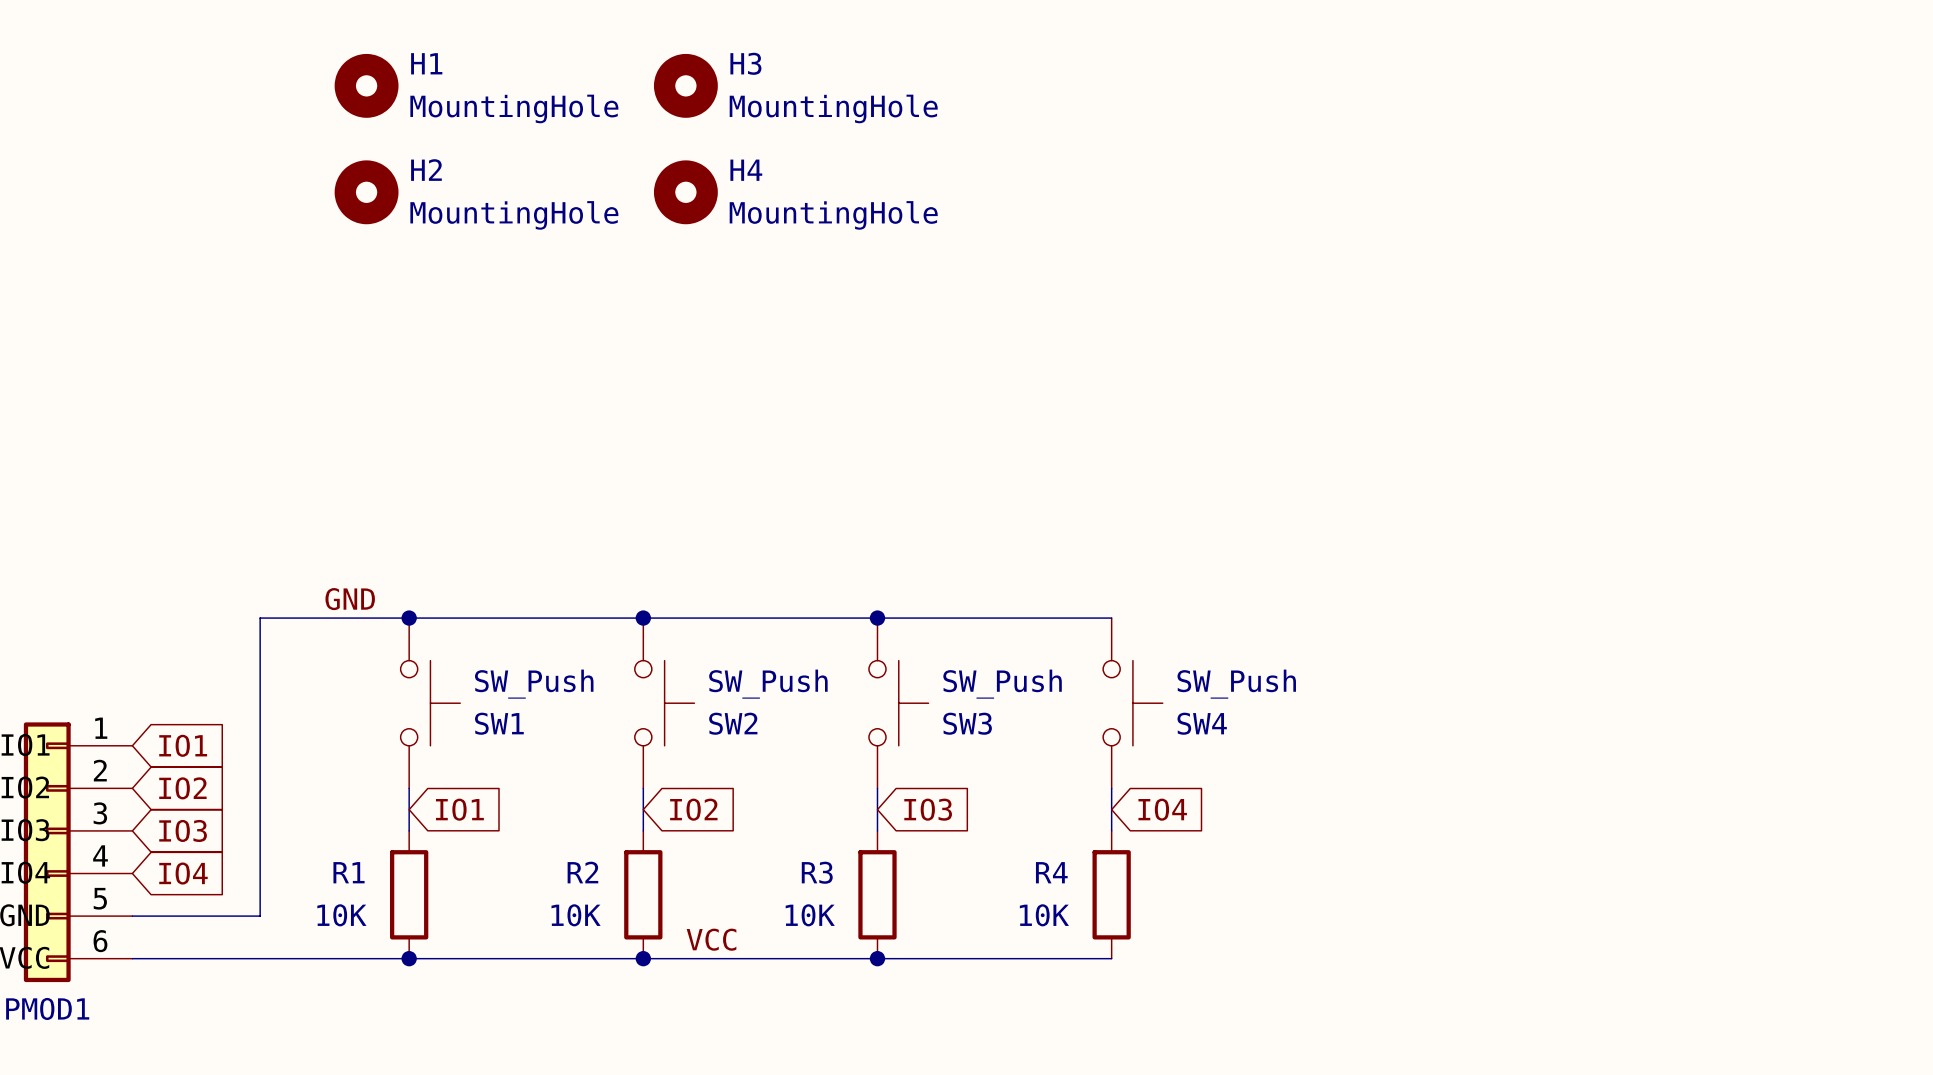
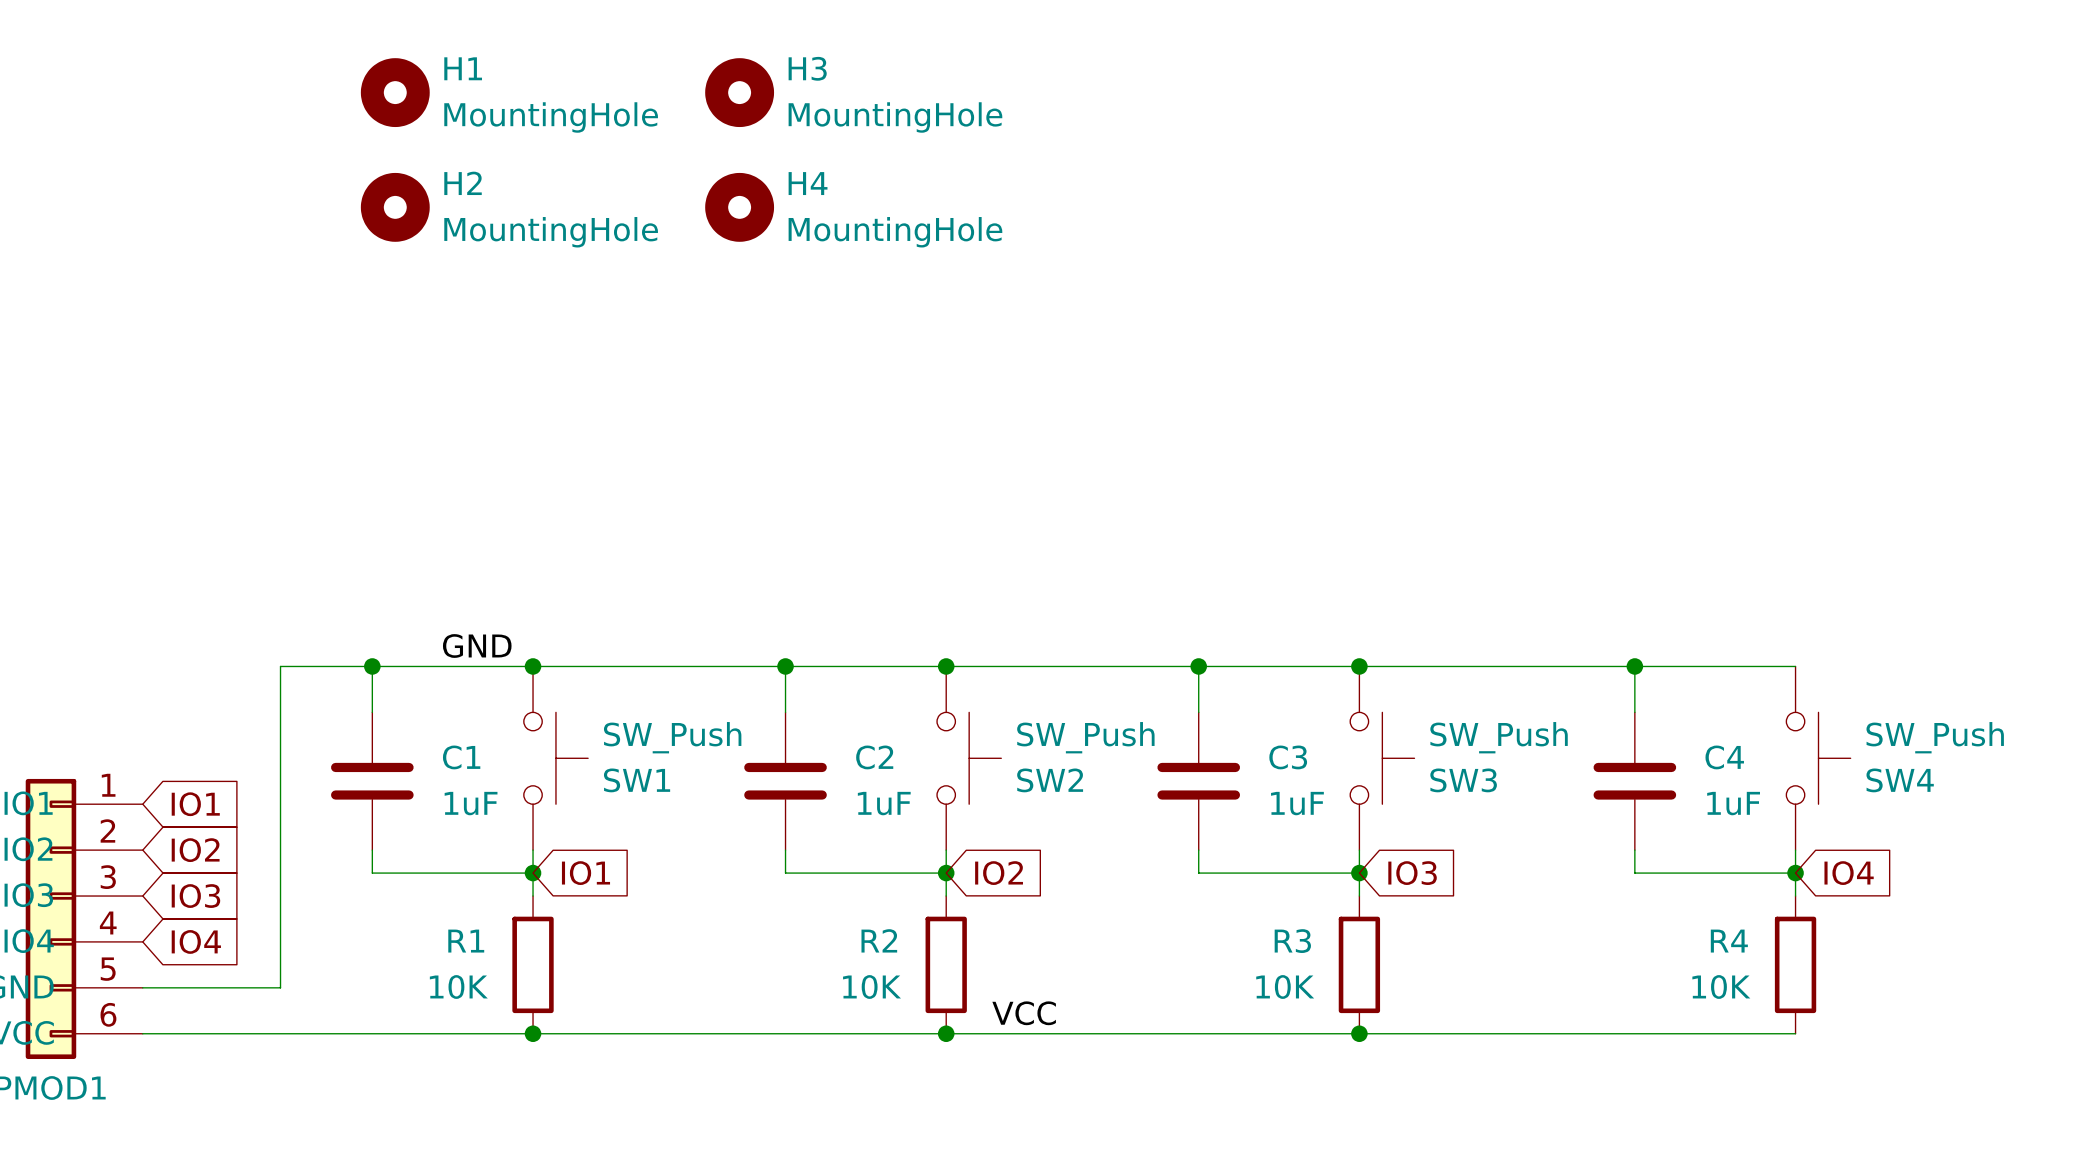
label position: GND (350, 599) -> GND (477, 646)
wire: none -> (372, 666) (372, 712)
junction: none -> (372, 666)
junction: (409, 618) -> none
junction: none -> (533, 666)
junction: (643, 618) -> none
junction: none -> (785, 666)
junction: none -> (1198, 666)
junction: none -> (1359, 666)
wire: none -> (1634, 666) (1634, 712)
junction: none -> (1634, 666)
wire: none -> (1795, 666) (1198, 666) (1198, 712)
SW1 position: (430, 703) -> (555, 758)
SW2: SW_Push (664, 703) -> none
SW4 position: (1132, 703) -> (1818, 758)
SW3: none -> SW_Push (1382, 758)
SW3 name: SW3 (967, 723) -> SW2 (1050, 780)
C1: none -> 1uF (372, 781)
C2: none -> 1uF (785, 781)
C3: none -> 1uF (1198, 781)
C4: none -> 1uF (1634, 781)
wire: none -> (372, 850) (372, 873) (533, 873)
wire: (409, 788) (409, 830) -> (533, 850) (533, 896)
wire: (643, 788) (643, 830) -> (785, 666) (785, 712)
wire: none -> (785, 850) (785, 873) (946, 873)
wire: none -> (1359, 850) (1359, 896)
wire: none -> (1634, 850) (1634, 873) (1795, 873)
wire: none -> (1795, 850) (1795, 896)
global label position: IO1 (459, 809) -> IO1 (585, 873)
junction: none -> (533, 873)
global label: IO2 (693, 809) -> none
junction: none -> (946, 873)
global label: IO3 (928, 809) -> IO2 (999, 873)
wire: (1111, 809) (1111, 830) -> (1198, 873) (1359, 873)
global label: IO4 (1162, 809) -> none
junction: none -> (1359, 873)
global label: none -> IO3 (1412, 873)
junction: none -> (1795, 873)
global label: none -> IO4 (1849, 873)
R3 name: R3 (817, 872) -> R2 (879, 940)
R1 position: (409, 894) -> (533, 964)
R2: 10K (643, 894) -> none
R4 position: (1111, 894) -> (1795, 964)
R3: none -> 10K (1359, 964)
label position: VCC (711, 939) -> VCC (1024, 1013)
junction: (409, 958) -> none
junction: none -> (533, 1033)
junction: (643, 958) -> none
wire: none -> (1198, 1033) (1795, 1033)
junction: none -> (1359, 1033)

